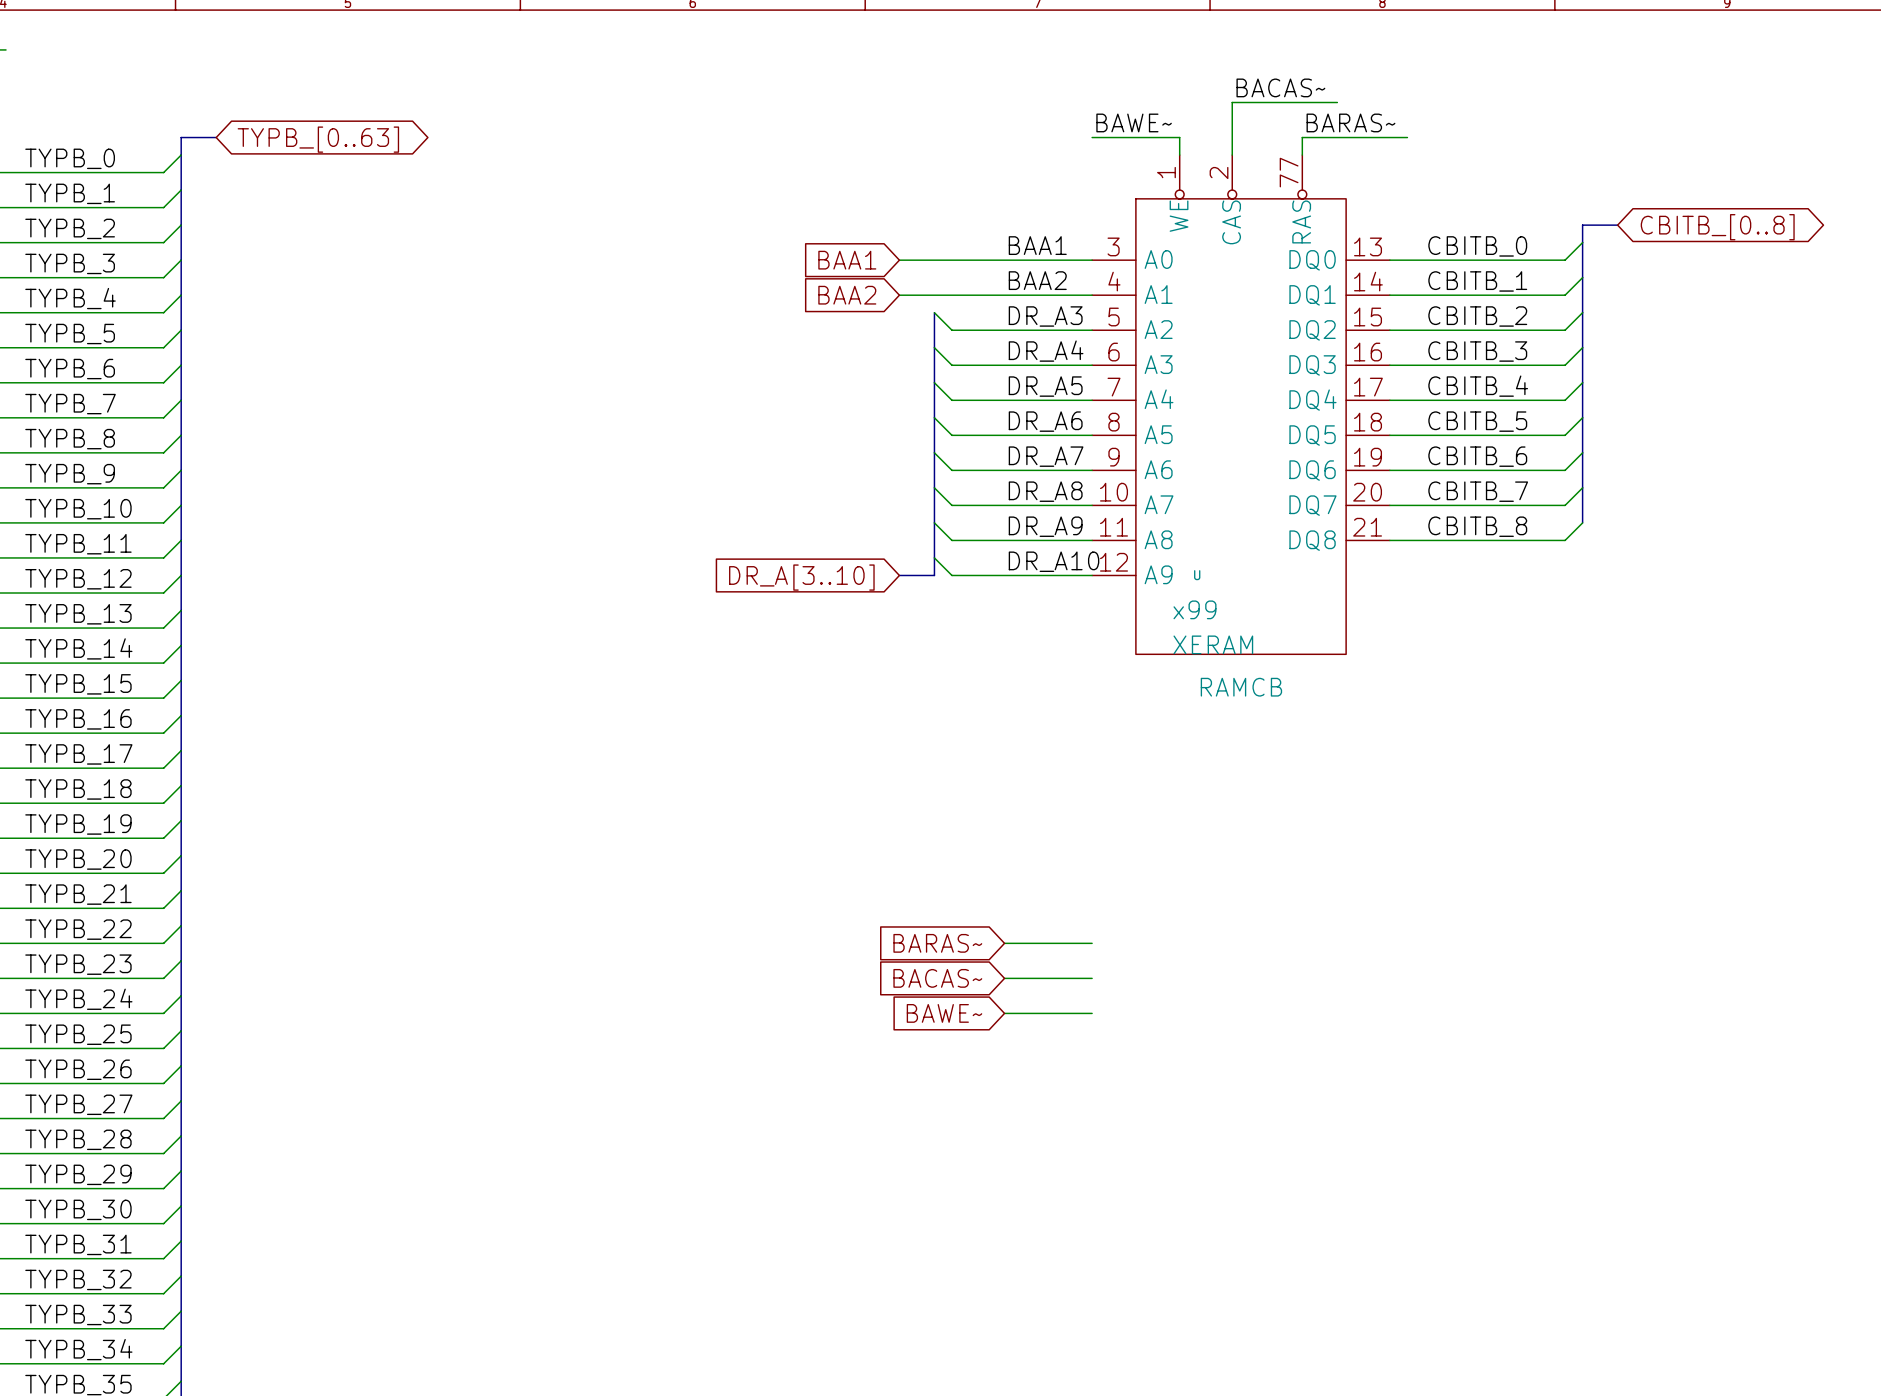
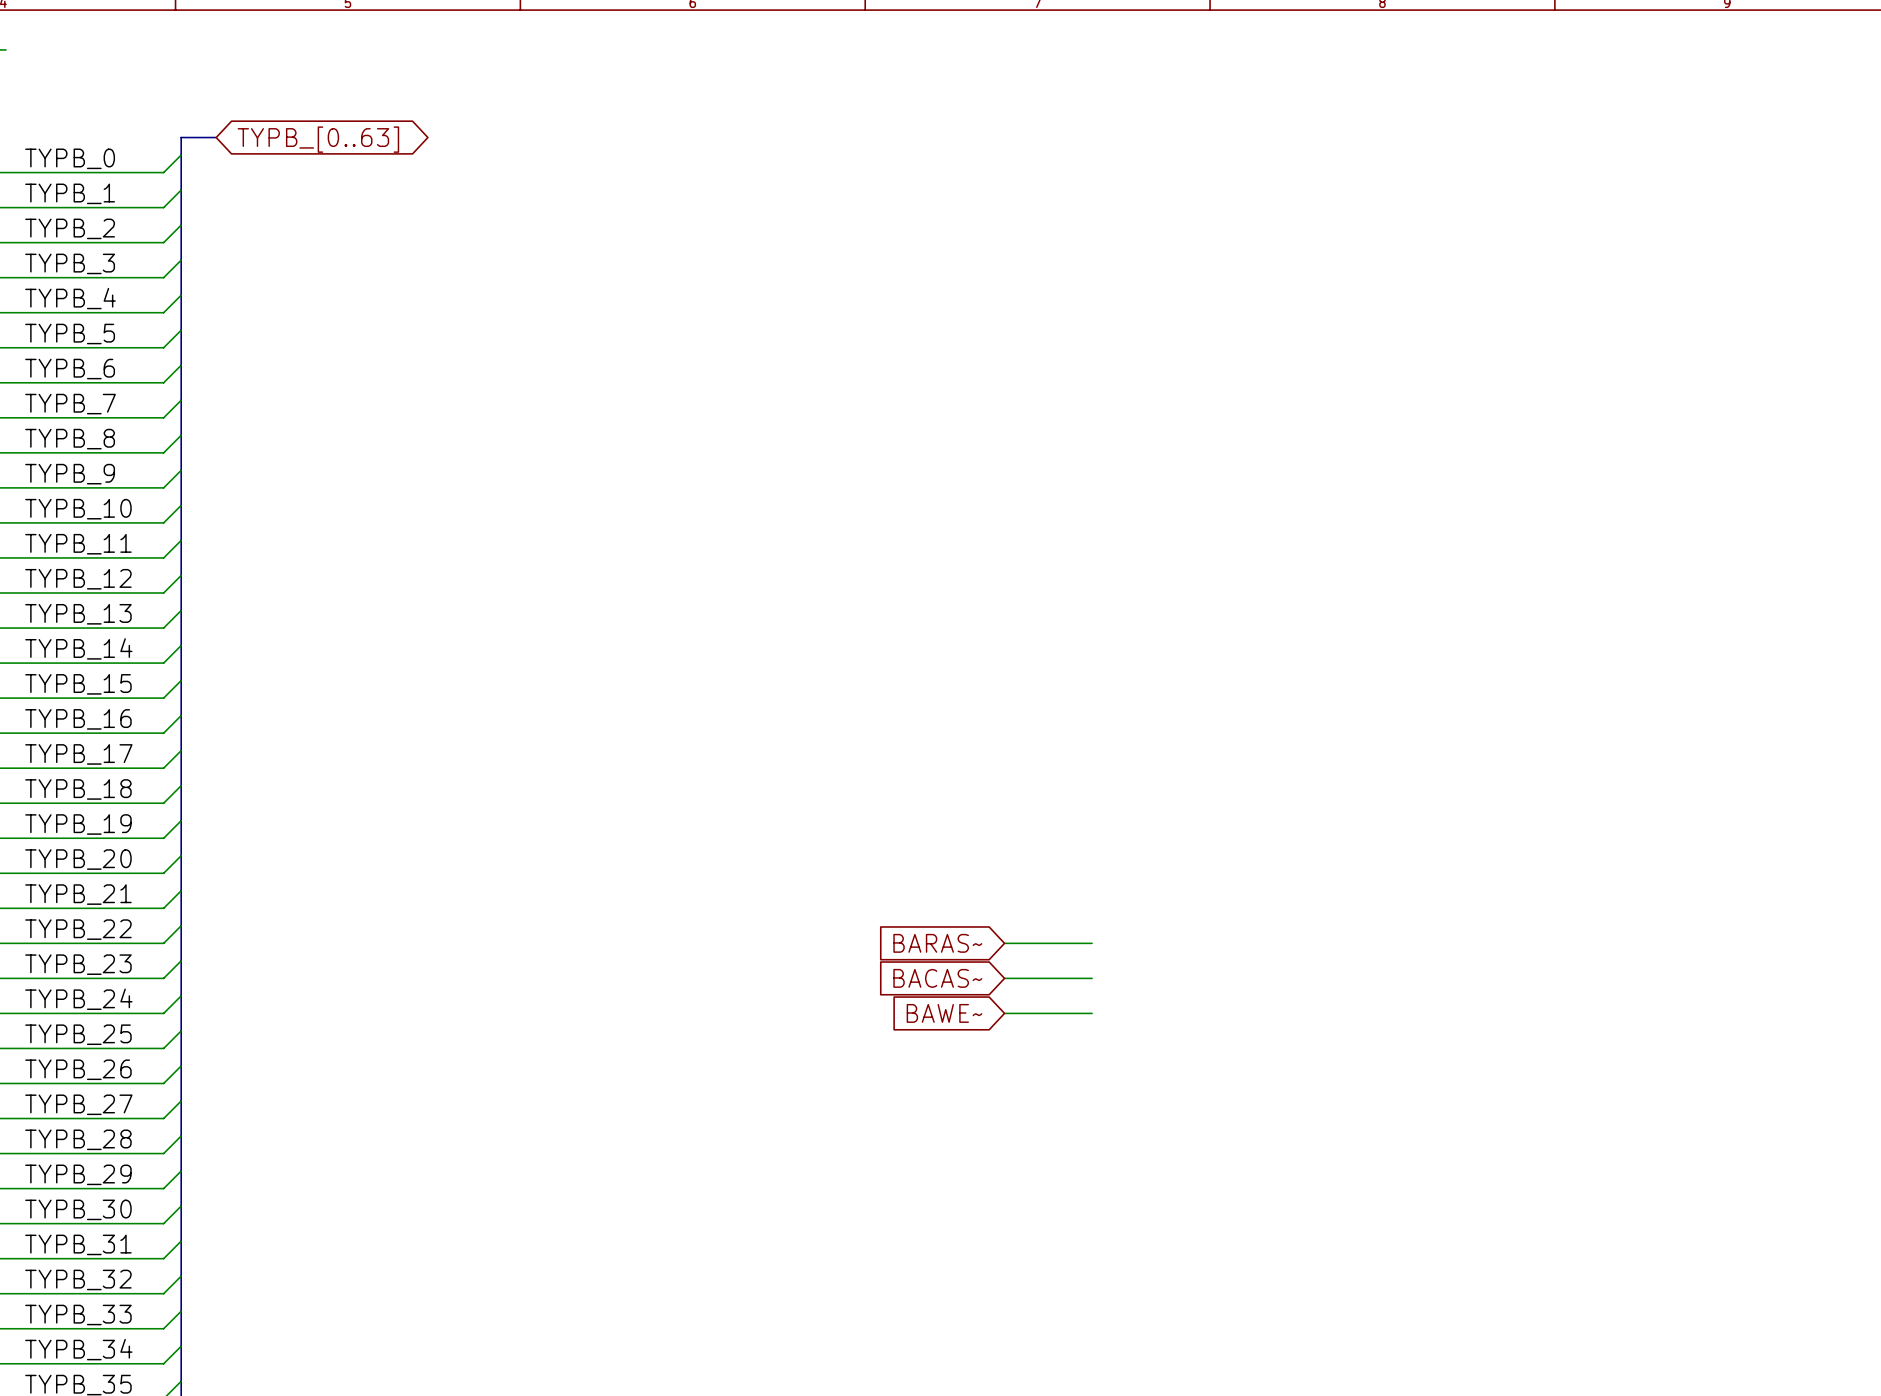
label: BACAS~ (1280, 87) -> none
wire: (1337, 102) (1232, 102) (1232, 155) -> none
label: BAWE~ (1134, 122) -> none
label: BARAS~ (1350, 122) -> none
wire: (1092, 137) (1179, 137) (1179, 155) -> none
wire: (1407, 137) (1302, 137) (1302, 155) -> none
bus: (1617, 225) (1582, 225) (1582, 522) -> none
global label: CBITB_[0..8] (1717, 227) -> none
wire: (1582, 242) (1565, 260) (1389, 260) -> none
label: BAA1 (1037, 245) -> none
label: CBITB_0 (1477, 246) -> none
global label: BAA1 (847, 260) -> none
wire: (899, 260) (1092, 260) -> none
wire: (1582, 277) (1565, 295) (1389, 295) -> none
label: BAA2 (1037, 280) -> none
label: CBITB_1 (1477, 281) -> none
global label: BAA2 (847, 295) -> none
wire: (899, 295) (1092, 295) -> none
wire: (934, 312) (951, 330) (1092, 330) -> none
bus: (934, 312) (934, 575) (899, 575) -> none
wire: (1582, 312) (1565, 330) (1389, 330) -> none
label: DR_A3 (1045, 316) -> none
label: CBITB_2 (1477, 316) -> none
wire: (934, 347) (951, 365) (1092, 365) -> none
wire: (1582, 347) (1565, 365) (1389, 365) -> none
label: DR_A4 (1046, 351) -> none
label: CBITB_3 (1477, 351) -> none
wire: (934, 382) (951, 400) (1092, 400) -> none
wire: (1582, 382) (1565, 400) (1389, 400) -> none
label: DR_A5 (1045, 386) -> none
label: CBITB_4 (1478, 386) -> none
U: XERAM (1241, 404) -> none
wire: (934, 417) (951, 435) (1092, 435) -> none
wire: (1582, 417) (1565, 435) (1389, 435) -> none
label: DR_A6 (1045, 421) -> none
label: CBITB_5 (1477, 421) -> none
wire: (934, 452) (951, 470) (1092, 470) -> none
wire: (1582, 452) (1565, 470) (1389, 470) -> none
label: DR_A7 (1046, 456) -> none
label: CBITB_6 (1477, 456) -> none
wire: (934, 487) (951, 505) (1092, 505) -> none
wire: (1582, 487) (1565, 505) (1389, 505) -> none
label: DR_A8 (1045, 491) -> none
label: CBITB_7 (1478, 491) -> none
wire: (934, 522) (951, 540) (1092, 540) -> none
wire: (1582, 522) (1565, 540) (1389, 540) -> none
label: DR_A9 (1045, 526) -> none
label: CBITB_8 (1477, 526) -> none
wire: (934, 557) (951, 575) (1092, 575) -> none
label: DR_A10 (1054, 561) -> none
global label: DR_A[3..10] (801, 577) -> none

